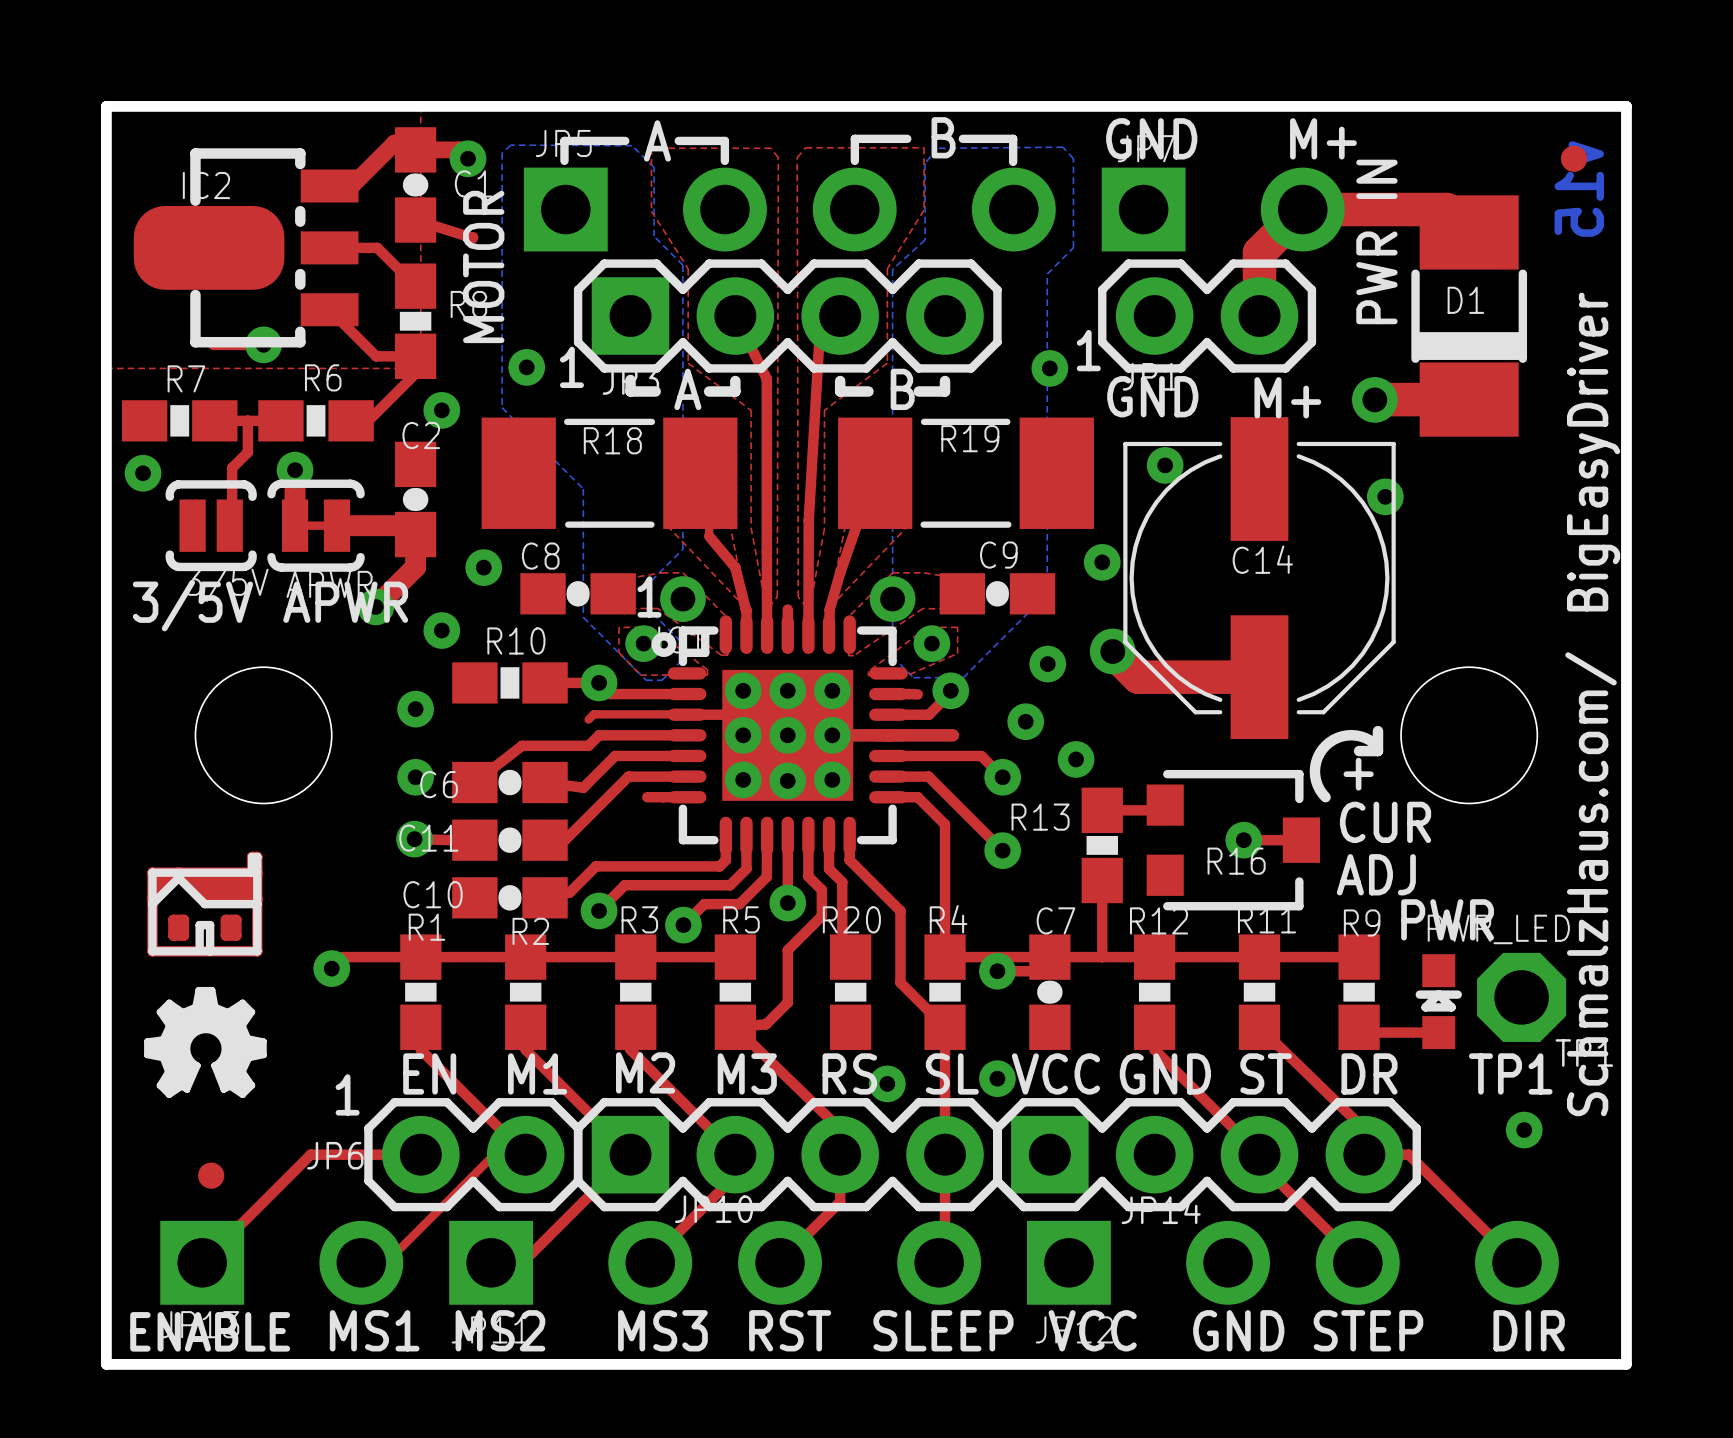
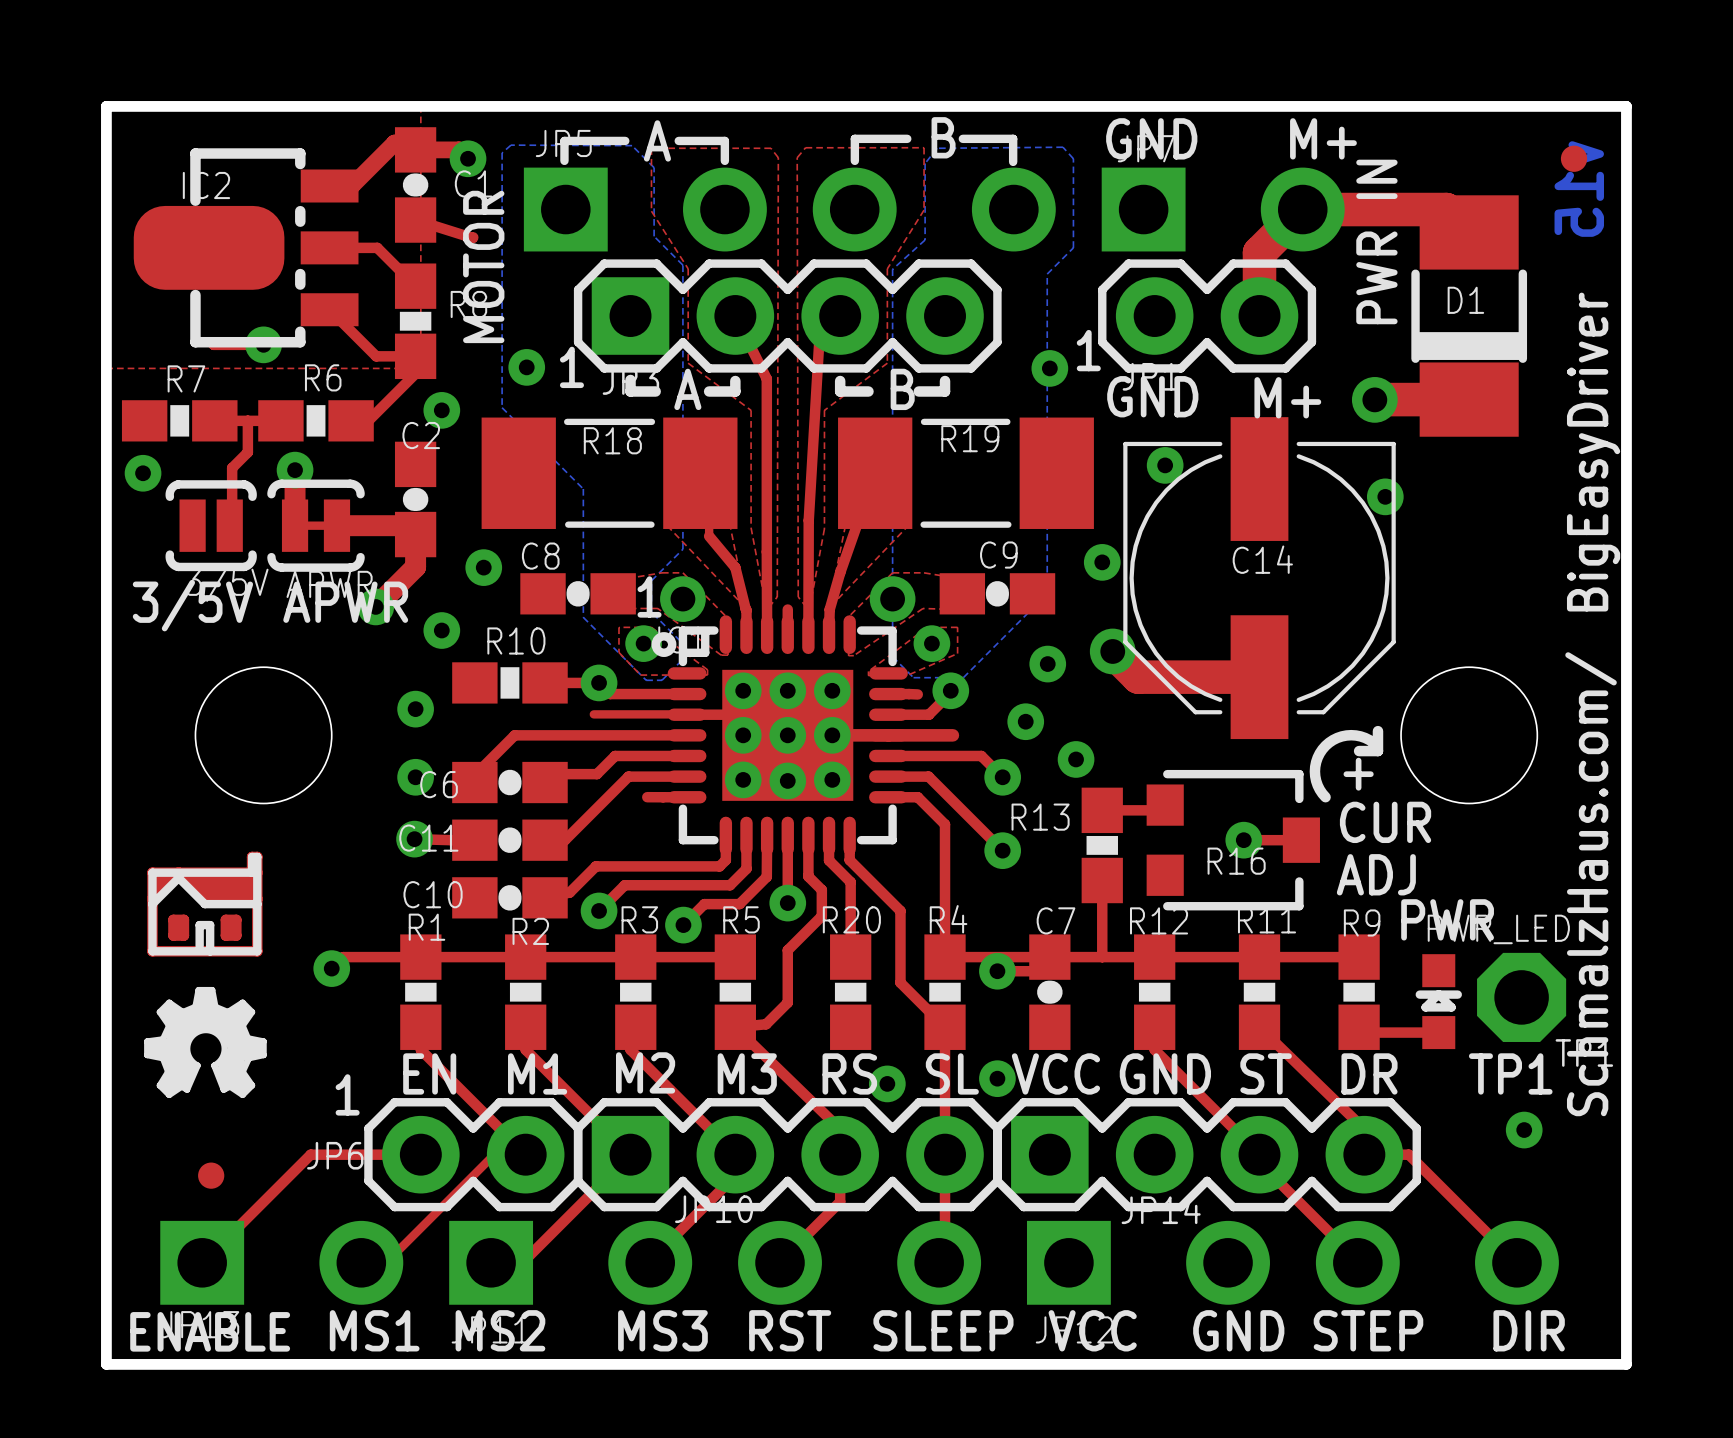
top track: (593, 714) (588, 719) -> none
top track: (599, 735) (588, 745) (522, 745) (474, 782) -> (599, 735) (514, 735) (475, 774)
top track: (596, 774) (583, 787) (545, 782) -> (596, 774) (546, 774)
top track: (829, 860) (829, 868) (842, 882) (842, 968) -> (829, 860) (850, 882) (850, 957) (853, 953)

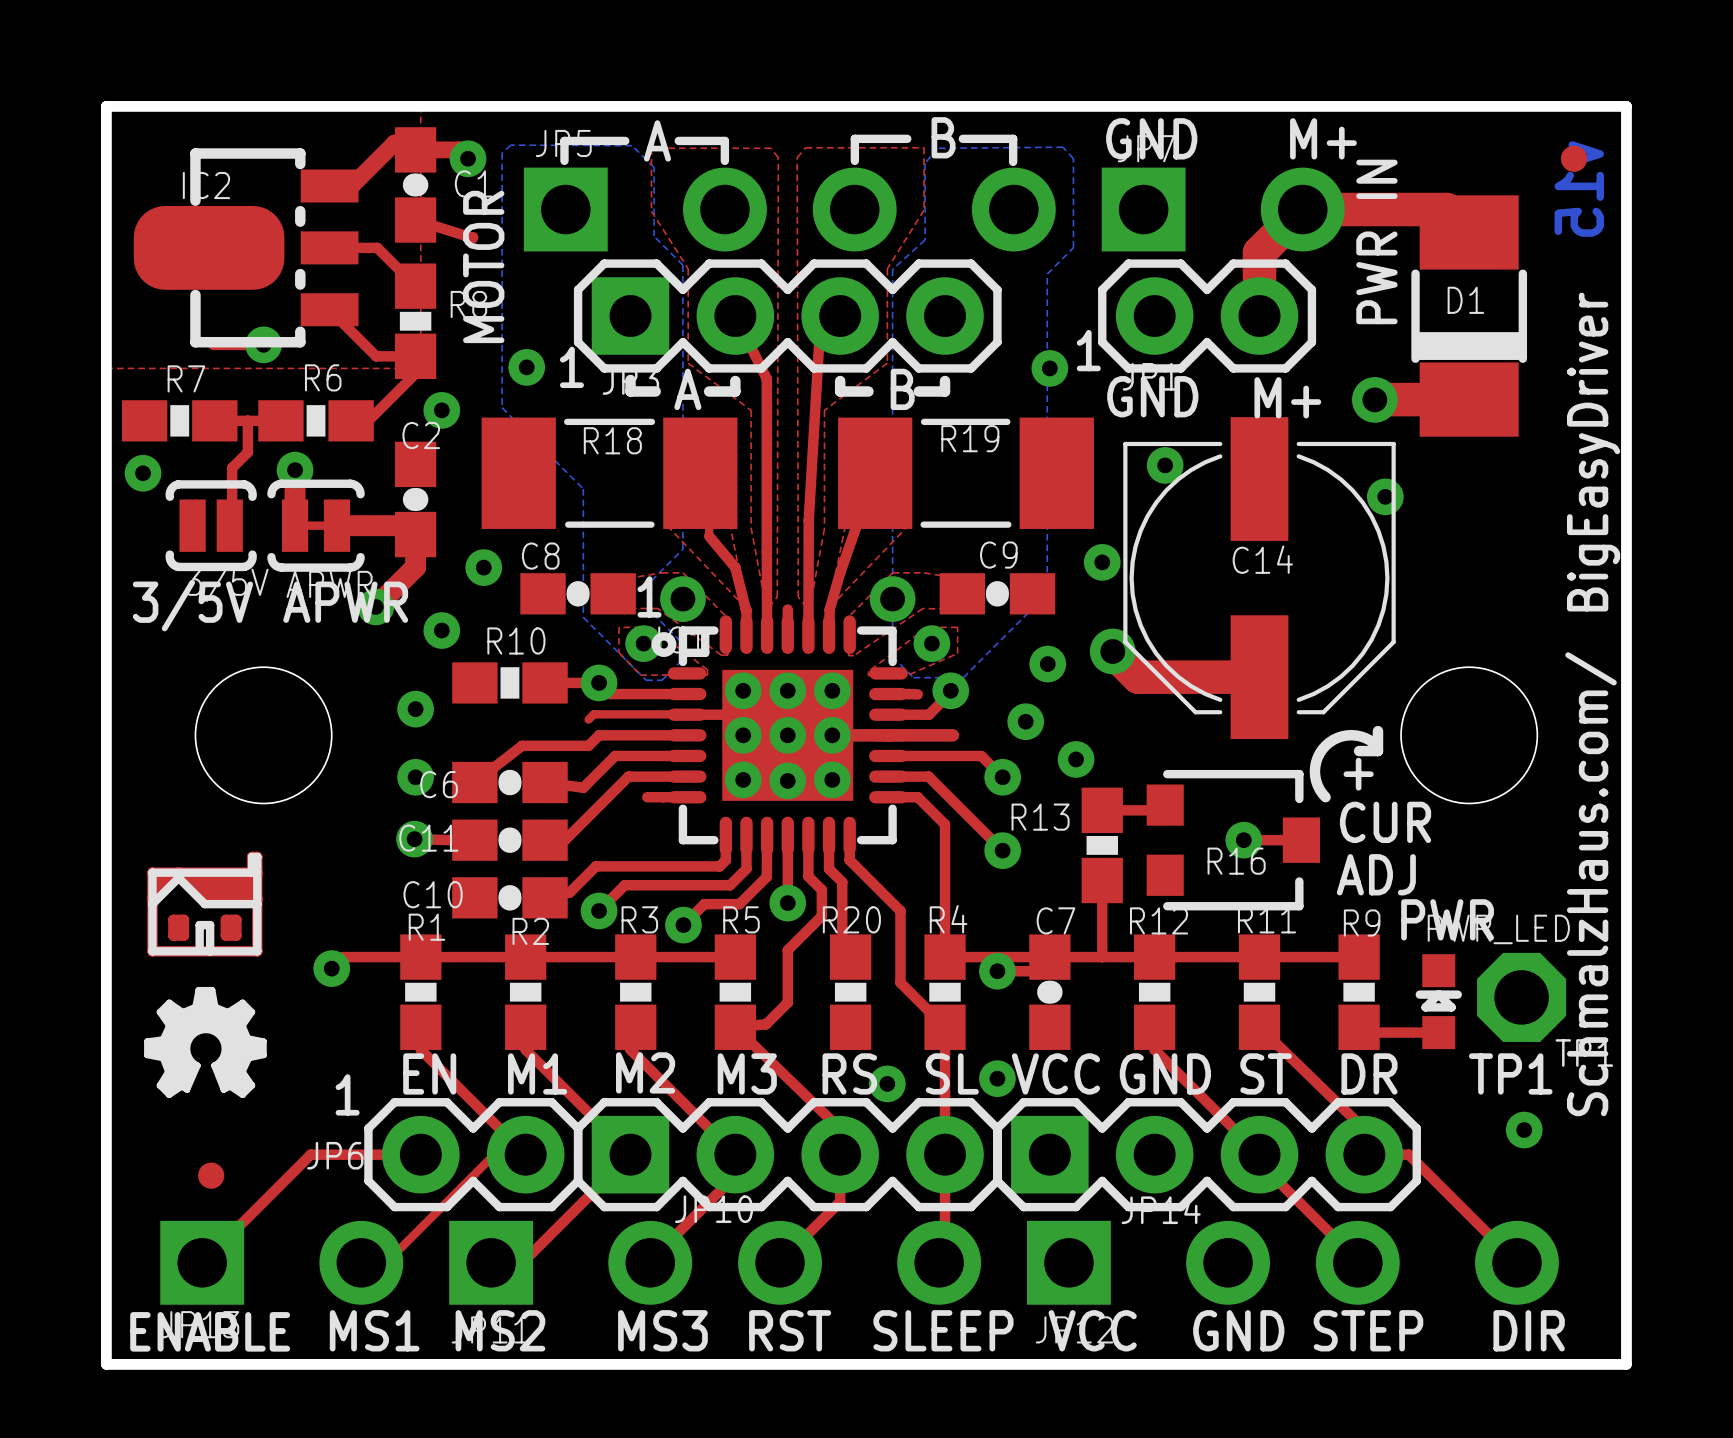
top track: none -> (593, 714) (588, 719)
top track: (599, 735) (514, 735) (475, 774) -> (599, 735) (588, 745) (522, 745) (474, 782)
top track: (546, 774) (596, 774) -> (545, 782) (583, 787) (596, 774)
top track: (829, 860) (850, 882) (850, 957) (853, 953) -> (829, 860) (829, 868) (842, 882) (842, 968)

